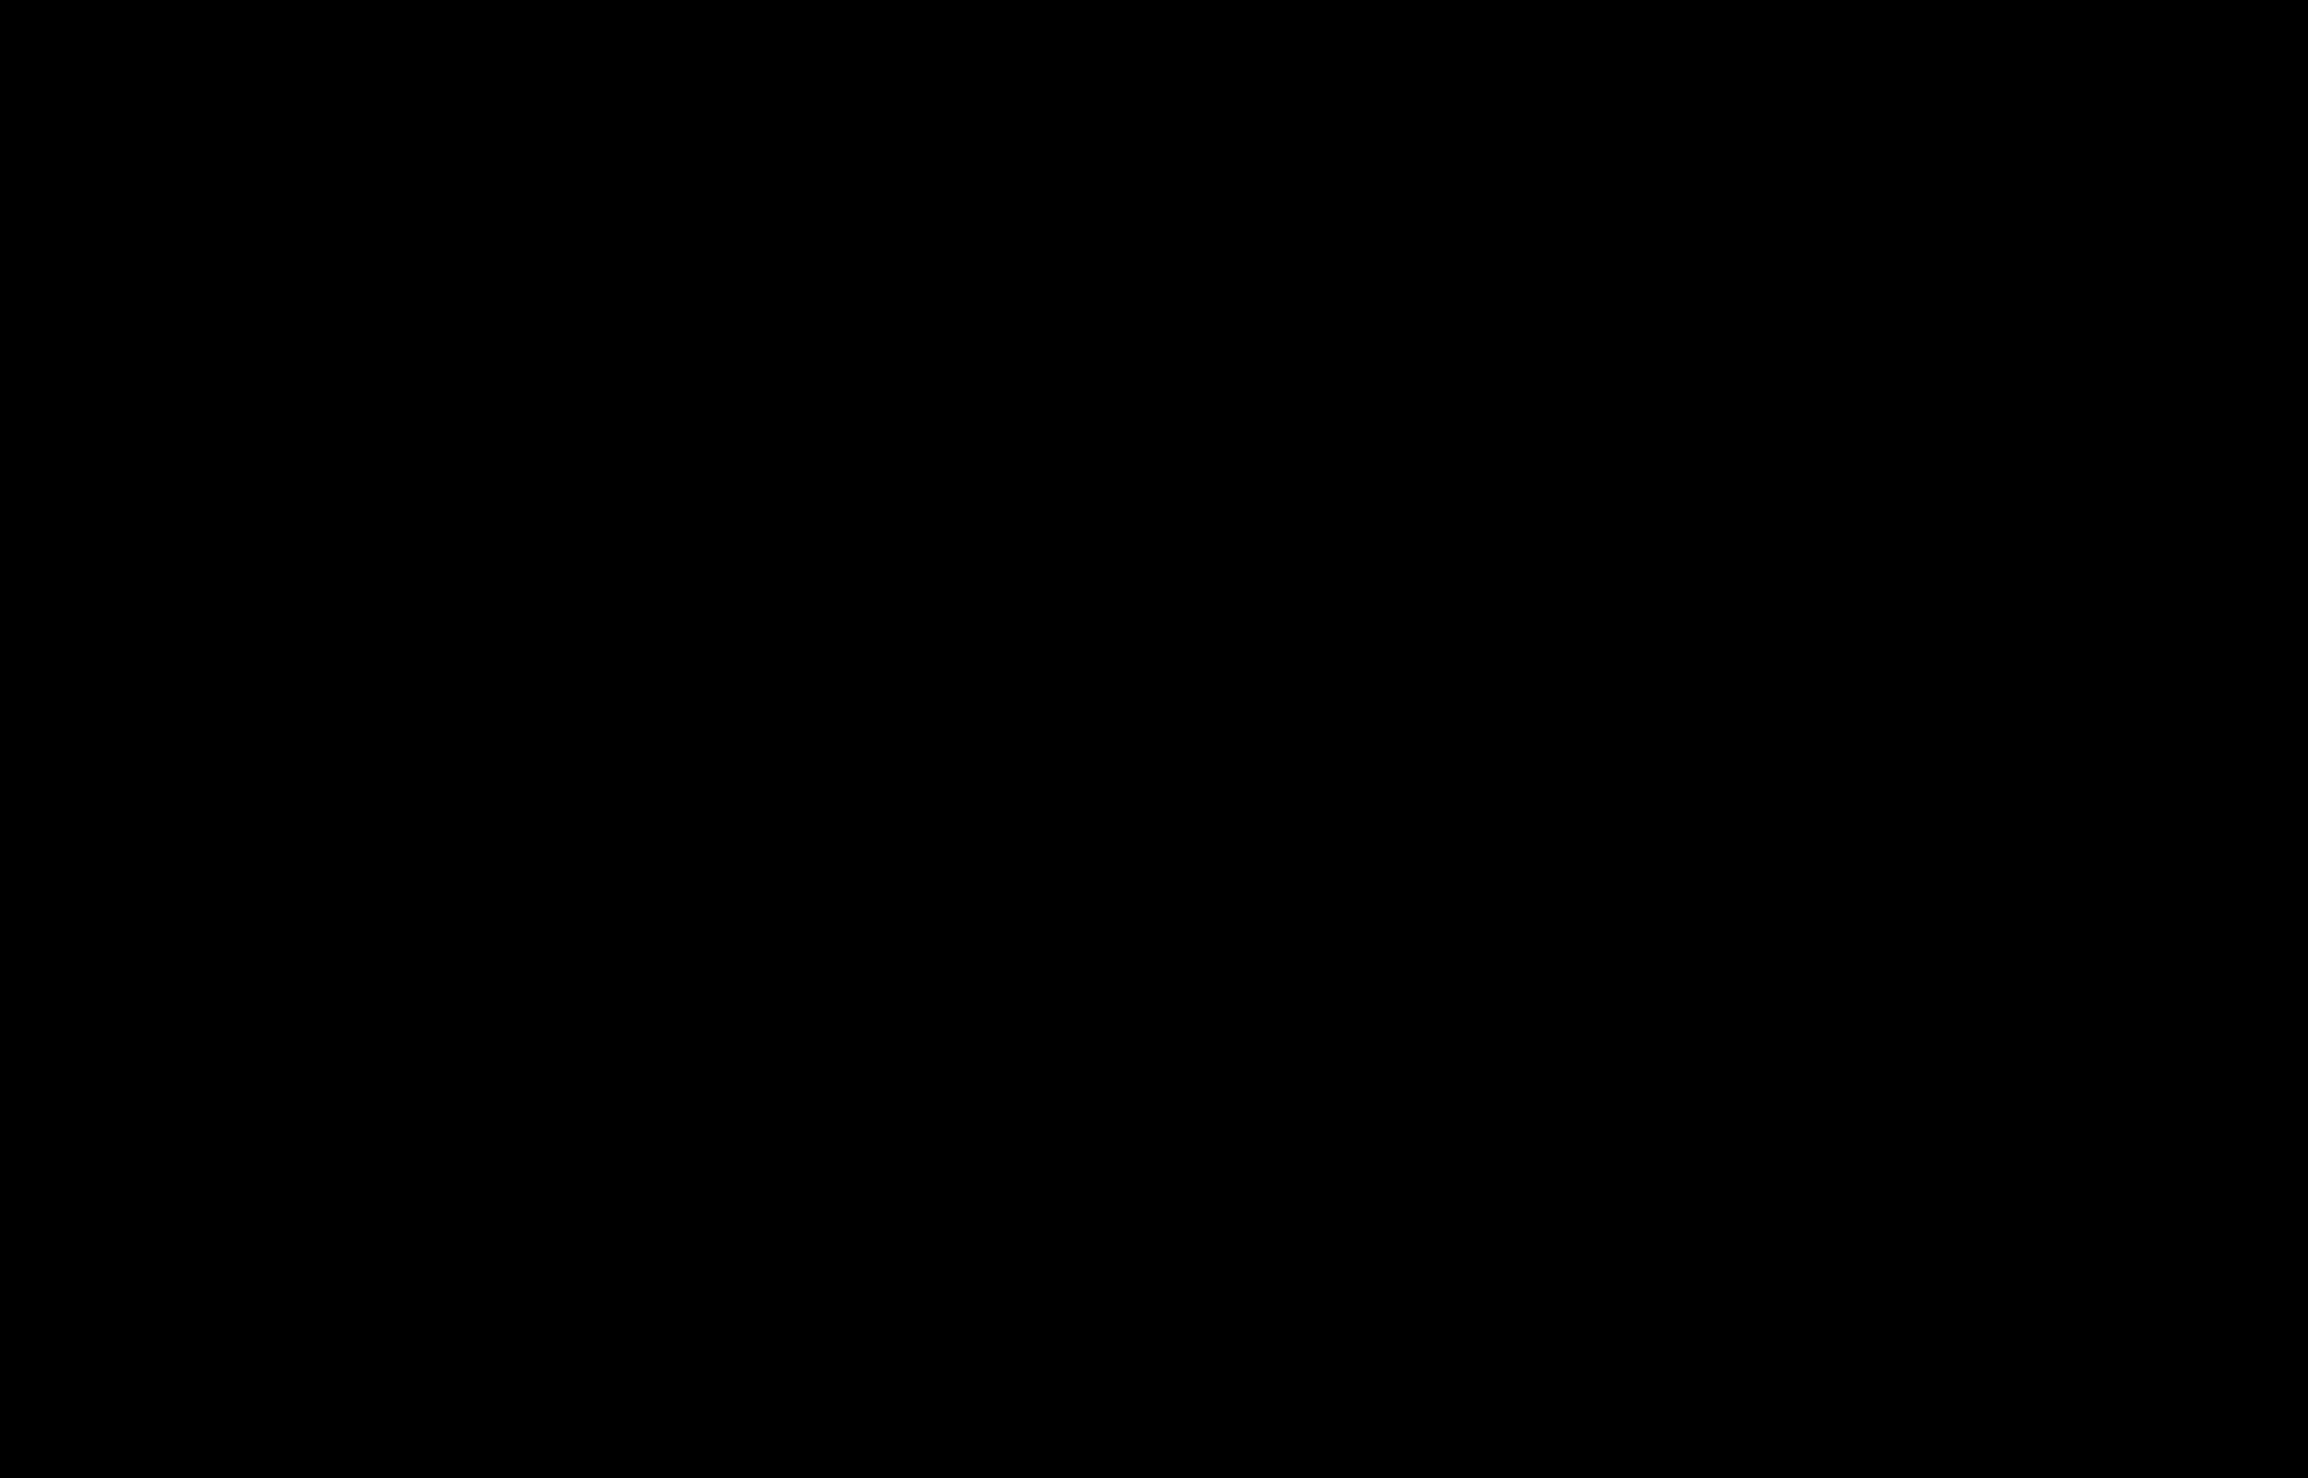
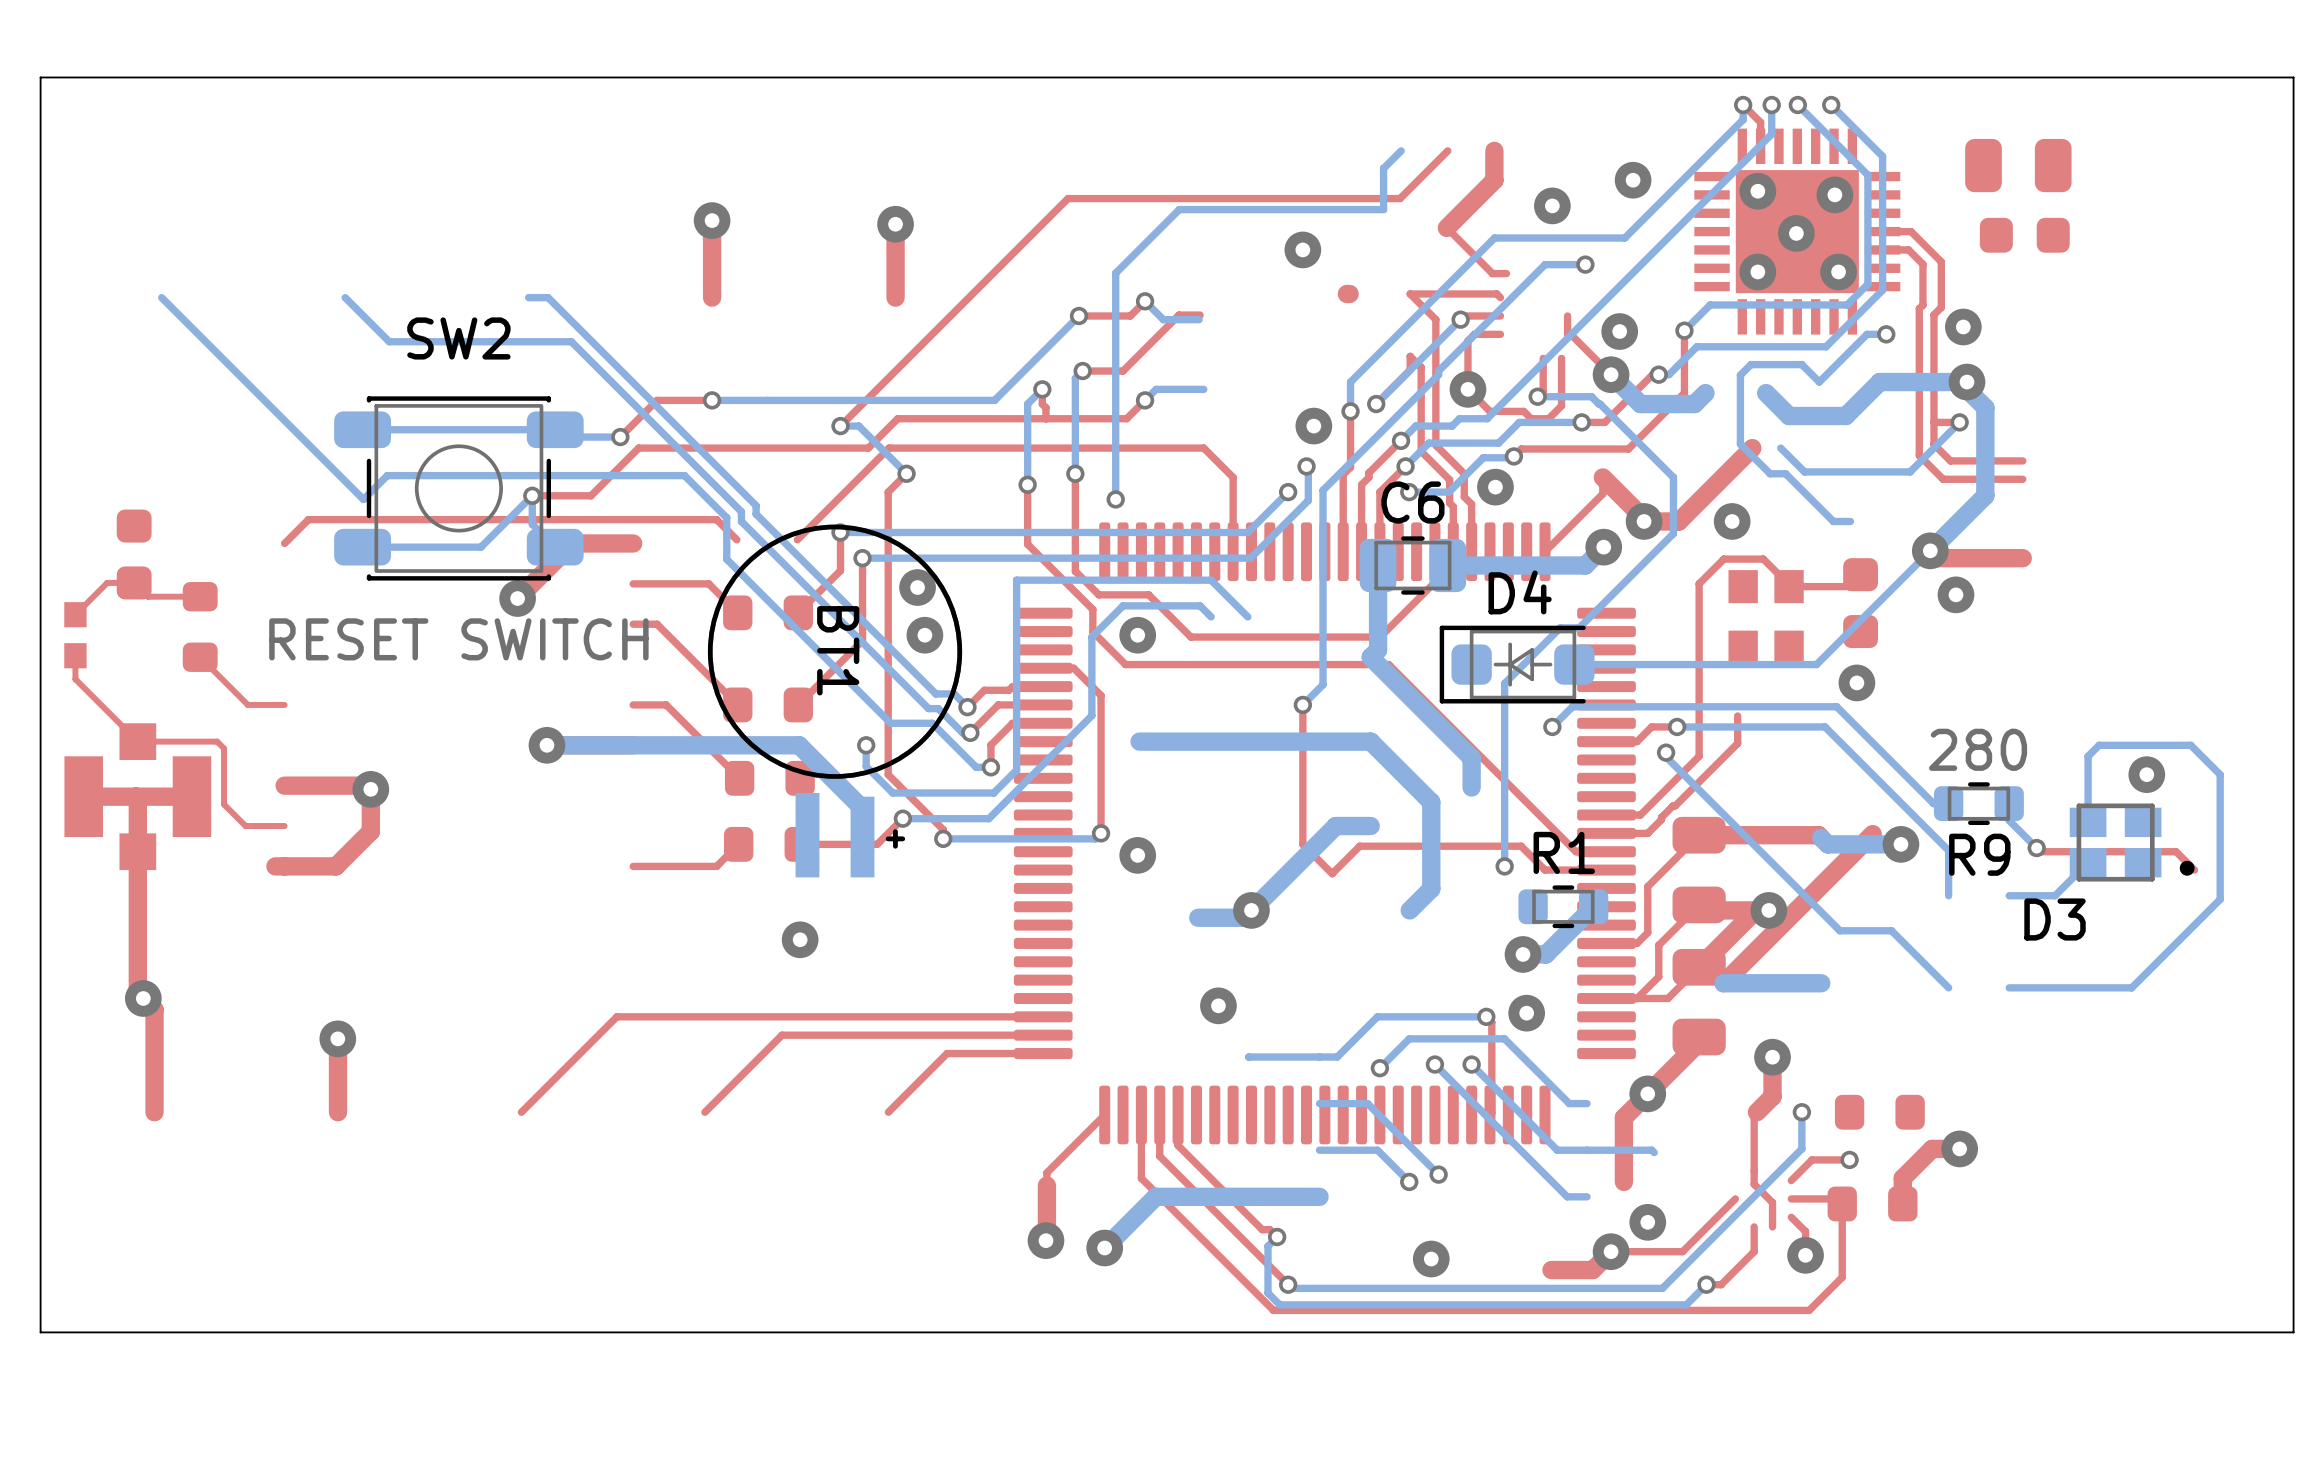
board edge: none -> (2293, 77) (2293, 1332) (40, 1332) (40, 77) (2293, 77)
top track: none -> (1743, 105) (1760, 122) (1760, 146)
bottom track: none -> (1743, 105) (1743, 119) (1624, 238) (1494, 238) (1350, 382) (1350, 411)
via: none -> (1743, 105)
bottom track: none -> (1771, 105) (1771, 134) (1487, 418) (1459, 418) (1452, 426) (1415, 426) (1401, 440)
via: none -> (1771, 105)
bottom track: none -> (1797, 105) (1867, 175) (1867, 284) (1847, 304) (1710, 304) (1684, 330)
via: none -> (1797, 105)
bottom track: none -> (1831, 105) (1882, 156) (1882, 290) (1826, 346) (1696, 346) (1668, 374) (1658, 374)
via: none -> (1831, 105)
bottom track: none -> (1401, 150) (1383, 168) (1383, 209) (1179, 209) (1115, 273) (1115, 499)
top track: none -> (1447, 150) (1400, 198) (1068, 198) (840, 426)
top track: none -> (1494, 150) (1494, 180) (1446, 227) (1492, 273) (1506, 273)
part: none -> (2018, 165)
via: none -> (1633, 180)
via: none -> (1757, 191)
via: none -> (1834, 194)
via: none -> (1552, 205)
top track: none -> (712, 220) (712, 297)
via: none -> (712, 220)
top track: none -> (895, 224) (895, 297)
via: none -> (895, 224)
part: none -> (1797, 231)
top track: none -> (1882, 231) (1911, 231) (1941, 261) (1941, 307) (1933, 314) (1933, 444) (1950, 460) (2022, 460)
via: none -> (1796, 233)
part: none -> (2024, 235)
via: none -> (1302, 249)
top track: none -> (1882, 249) (1908, 249) (1922, 264) (1922, 305) (1919, 308) (1919, 455) (1943, 479) (2022, 479)
bottom track: none -> (1585, 264) (1545, 264) (1323, 490) (1323, 684) (1302, 704)
via: none -> (1585, 264)
via: none -> (1757, 271)
via: none -> (1838, 271)
top track: none -> (1349, 293) (1346, 293)
bottom track: none -> (161, 297) (363, 499) (387, 475) (684, 475) (726, 517) (726, 559) (890, 723) (932, 723) (976, 767) (990, 767)
bottom track: none -> (345, 297) (389, 341) (571, 341) (741, 511) (741, 521) (928, 708) (938, 708) (962, 732) (970, 732)
bottom track: none -> (528, 297) (548, 297) (756, 505) (756, 514) (935, 693) (954, 693) (967, 707)
top track: none -> (1500, 297) (1496, 293) (1410, 293) (1435, 319) (1435, 445) (1464, 473) (1464, 496) (1471, 504) (1471, 551)
top track: none -> (1145, 301) (1130, 315) (1079, 315)
bottom track: none -> (1145, 301) (1163, 319) (1199, 319)
via: none -> (1145, 301)
bottom track: none -> (1079, 315) (994, 400) (712, 400)
via: none -> (1079, 315)
top track: none -> (1200, 315) (1179, 315) (1123, 371) (1082, 371)
top track: none -> (1500, 315) (1464, 315) (1460, 319)
top track: none -> (1567, 315) (1567, 334) (1570, 334) (1611, 374)
bottom track: none -> (1460, 319) (1376, 404)
via: none -> (1460, 319)
via: none -> (1963, 327)
top track: none -> (1684, 330) (1684, 393) (1628, 449) (1521, 449) (1513, 456)
via: none -> (1684, 330)
via: none -> (1619, 331)
top track: none -> (1500, 334) (1474, 334) (1467, 340) (1467, 389) (1489, 411) (1523, 411) (1531, 418) (1548, 418) (1561, 405) (1561, 358)
bottom track: none -> (1886, 334) (1867, 334) (1819, 382) (1801, 364) (1750, 364) (1740, 375) (1740, 444) (1770, 473) (1785, 473) (1833, 521) (1850, 521)
via: none -> (1886, 334)
top track: none -> (1543, 358) (1543, 391) (1537, 396)
bottom track: none -> (1082, 371) (1075, 378) (1075, 473)
via: none -> (1082, 371)
bottom track: none -> (1611, 374) (1640, 404) (1694, 404) (1705, 393)
via: none -> (1611, 374)
top track: none -> (1658, 374) (1652, 374) (1604, 422) (1581, 422)
via: none -> (1658, 374)
via: none -> (1967, 382)
top track: none -> (1042, 389) (1042, 404) (1045, 407) (1045, 418)
bottom track: none -> (1042, 389) (1027, 404) (1027, 484)
via: none -> (1042, 389)
bottom track: none -> (1203, 389) (1156, 389) (1145, 400)
via: none -> (1467, 389)
bottom track: none -> (1766, 393) (1789, 415) (1845, 415) (1879, 382) (1967, 382) (1967, 389) (1985, 407) (1985, 495) (1816, 664) (1574, 664)
bottom track: none -> (1537, 396) (1591, 396) (1673, 477) (1673, 533) (1579, 627) (1560, 627) (1504, 683) (1504, 866)
via: none -> (1537, 396)
top track: none -> (712, 400) (657, 400) (620, 437)
via: none -> (712, 400)
top track: none -> (1145, 400) (1126, 418) (897, 418) (868, 448) (638, 448) (590, 495) (532, 495)
via: none -> (1145, 400)
top track: none -> (1376, 404) (1410, 370) (1410, 356) (1421, 367) (1421, 451) (1449, 479) (1449, 503) (1453, 506) (1453, 551)
via: none -> (1376, 404)
top track: none -> (1350, 411) (1350, 467) (1343, 474) (1343, 551)
via: none -> (1350, 411)
bottom track: none -> (1581, 422) (1519, 422) (1498, 443) (1428, 443) (1405, 466)
via: none -> (1581, 422)
top track: none -> (1959, 422) (1933, 422)
bottom track: none -> (1959, 422) (1910, 471) (1804, 471) (1780, 448)
via: none -> (1959, 422)
bottom track: none -> (840, 426) (858, 426) (906, 473)
via: none -> (840, 426)
via: none -> (1313, 426)
bottom track: none -> (362, 429) (555, 429) (562, 437) (620, 437)
via: none -> (620, 437)
top track: none -> (1401, 440) (1368, 472) (1368, 477) (1361, 484) (1361, 551)
via: none -> (1401, 440)
top track: none -> (1752, 448) (1678, 521) (1644, 521) (1644, 518) (1602, 477) (1602, 493) (1545, 551)
bottom track: none -> (1513, 456) (1483, 457) (1448, 492) (1409, 492)
via: none -> (1513, 456)
bottom track: none -> (1306, 466) (1308, 468) (1308, 500) (1250, 558) (862, 558)
via: none -> (1306, 466)
top track: none -> (1405, 466) (1379, 492) (1379, 551)
via: none -> (1405, 466)
top track: none -> (906, 473) (888, 492) (888, 774) (943, 829) (943, 838)
via: none -> (906, 473)
top track: none -> (1075, 473) (1075, 571) (1098, 594) (1148, 594) (1190, 637) (1380, 637) (1434, 582) (1434, 551)
via: none -> (1075, 473)
top track: none -> (1027, 484) (1027, 544) (1092, 609) (1092, 631) (1125, 664) (1388, 664) (1575, 851) (1606, 851)
via: none -> (1027, 484)
via: none -> (1495, 487)
SW2: none -> RESET SWITCH (458, 488)
bottom track: none -> (1288, 492) (1247, 532) (840, 532)
via: none -> (1288, 492)
via: none -> (1409, 492)
via: none -> (532, 495)
via: none -> (1115, 499)
via: none -> (1644, 521)
via: none -> (1732, 521)
top track: none -> (840, 532) (840, 570) (798, 612)
via: none -> (840, 532)
top track: none -> (736, 539) (716, 519) (308, 519) (284, 543)
top track: none -> (797, 539) (889, 448) (1203, 448) (1233, 477) (1233, 551)
top track: none -> (633, 543) (572, 543) (517, 598)
bottom track: none -> (555, 547) (532, 524) (532, 495) (480, 547) (362, 547)
bottom track: none -> (1603, 547) (1585, 565) (1447, 565)
via: none -> (1603, 547)
top track: none -> (1930, 550) (1937, 558) (2022, 558)
via: none -> (1930, 550)
part: none -> (134, 554)
top track: none -> (862, 558) (862, 640) (798, 704)
via: none -> (862, 558)
bottom track: none -> (1378, 565) (1378, 649) (1370, 657) (1471, 758) (1471, 787)
C6: none -> (1412, 565)
top track: none -> (1860, 574) (1848, 586) (1789, 586) (1763, 559) (1723, 559) (1699, 583) (1699, 756) (1640, 815) (1606, 815)
top track: none -> (633, 583) (708, 583) (737, 612)
via: none -> (917, 587)
via: none -> (1955, 594)
top track: none -> (200, 596) (147, 596) (134, 582) (107, 582) (75, 614)
via: none -> (517, 598)
part: none -> (1860, 603)
part: none -> (768, 612)
bottom track: none -> (1211, 616) (1200, 605) (1123, 605) (1091, 637) (1091, 715) (988, 818) (902, 818)
bottom track: none -> (1247, 616) (1211, 580) (1016, 580) (1016, 770) (993, 793) (892, 793) (866, 766) (866, 745)
part: none -> (1766, 616)
top track: none -> (633, 624) (657, 624) (737, 704)
part: none -> (200, 626)
part: none -> (75, 635)
via: none -> (924, 635)
via: none -> (1137, 635)
top track: none -> (75, 655) (75, 679) (137, 741) (217, 741) (224, 748) (224, 804) (245, 826) (284, 826)
top track: none -> (200, 657) (247, 704) (284, 704)
D4: none -> (1517, 664)
top track: none -> (1043, 668) (1073, 668) (1101, 695) (1101, 833)
via: none -> (1856, 682)
top track: none -> (1043, 686) (1012, 686) (1009, 690) (984, 690) (967, 707)
BT1: none -> (835, 701)
top track: none -> (633, 704) (666, 704) (739, 778)
part: none -> (768, 704)
top track: none -> (1043, 704) (998, 704) (970, 732)
top track: none -> (1302, 704) (1302, 844) (1332, 873) (1359, 846) (1521, 846) (1545, 870) (1606, 870)
via: none -> (1302, 704)
via: none -> (967, 707)
top track: none -> (1737, 715) (1737, 743) (1661, 817) (1647, 833) (1606, 833)
top track: none -> (1043, 723) (1012, 723) (990, 745) (990, 767)
bottom track: none -> (1552, 726) (1572, 706) (1836, 706) (1933, 803) (1948, 803)
via: none -> (1552, 726)
top track: none -> (1677, 726) (1651, 726) (1637, 741) (1606, 741)
bottom track: none -> (1677, 726) (1825, 726) (1948, 850) (1948, 895)
via: none -> (1677, 726)
via: none -> (970, 732)
bottom track: none -> (1139, 741) (1370, 741) (1431, 802) (1431, 888) (1409, 910)
bottom track: none -> (546, 745) (799, 745) (862, 808) (862, 837)
via: none -> (546, 745)
via: none -> (866, 745)
bottom track: none -> (1666, 752) (1666, 756) (1839, 930) (1891, 930) (1948, 987)
via: none -> (1666, 752)
via: none -> (990, 767)
via: none -> (2146, 774)
part: none -> (769, 778)
top track: none -> (284, 785) (367, 785) (370, 789) (370, 831) (335, 866) (275, 866)
via: none -> (370, 789)
top track: none -> (136, 796) (137, 798) (137, 992) (154, 1009) (154, 1112)
part: none -> (137, 796)
top track: none -> (191, 796) (83, 796)
R9: none -> 280 (1978, 803)
bottom track: none -> (2009, 803) (2009, 820) (2036, 848)
top track: none -> (902, 818) (877, 844) (799, 844)
via: none -> (902, 818)
bottom track: none -> (2088, 822) (2088, 756) (2099, 745) (2190, 745) (2220, 774) (2220, 899) (2131, 987) (2009, 987)
bottom track: none -> (1370, 826) (1335, 826) (1244, 917) (1198, 917)
bottom track: none -> (1101, 833) (1095, 838) (943, 838)
via: none -> (1101, 833)
part: none -> (1324, 833)
top track: none -> (1872, 834) (1723, 983)
top track: none -> (1821, 837) (1818, 835) (1699, 835) (1647, 886) (1647, 932) (1637, 943) (1606, 943)
bottom track: none -> (1821, 837) (1827, 844) (1900, 844)
via: none -> (943, 838)
D3: none -> (2132, 842)
top track: none -> (738, 844) (716, 866) (633, 866)
part: none -> (768, 844)
via: none -> (1900, 844)
top track: none -> (2036, 848) (2040, 851) (2176, 851) (2194, 870)
via: none -> (2036, 848)
via: none -> (1137, 855)
bottom track: none -> (2088, 862) (2055, 895) (2009, 895)
via: none -> (1504, 866)
part: none -> (1699, 870)
R1: none -> (1563, 906)
bottom track: none -> (1593, 906) (1545, 954) (1523, 954)
via: none -> (1251, 910)
top track: none -> (1756, 910) (1667, 998) (1606, 998)
top track: none -> (1768, 910) (1704, 910) (1699, 904) (1658, 945) (1658, 976) (1637, 998)
via: none -> (1768, 910)
via: none -> (800, 939)
via: none -> (1523, 954)
bottom track: none -> (1821, 983) (1723, 983)
via: none -> (143, 998)
part: none -> (1699, 1002)
via: none -> (1218, 1005)
via: none -> (1526, 1013)
top track: none -> (1043, 1016) (616, 1016) (521, 1112)
top track: none -> (1486, 1016) (1491, 1022) (1491, 1113) (1489, 1114)
bottom track: none -> (1486, 1016) (1377, 1016) (1337, 1057) (1248, 1057)
via: none -> (1486, 1016)
top track: none -> (1043, 1035) (781, 1035) (704, 1112)
top track: none -> (1699, 1037) (1699, 1042) (1623, 1117) (1623, 1181)
via: none -> (337, 1038)
top track: none -> (337, 1039) (337, 1112)
top track: none -> (1043, 1053) (947, 1053) (888, 1112)
top track: none -> (1772, 1057) (1772, 1096) (1754, 1114) (1754, 1184) (1772, 1202) (1772, 1226)
via: none -> (1772, 1057)
bottom track: none -> (1434, 1064) (1567, 1196) (1587, 1196)
via: none -> (1434, 1064)
bottom track: none -> (1471, 1064) (1557, 1150) (1651, 1150) (1654, 1152)
via: none -> (1471, 1064)
bottom track: none -> (1379, 1068) (1409, 1038) (1504, 1038) (1569, 1103) (1587, 1103)
via: none -> (1379, 1068)
via: none -> (1647, 1093)
bottom track: none -> (1319, 1103) (1367, 1103) (1438, 1174)
bottom track: none -> (1801, 1112) (1801, 1148) (1662, 1288) (1291, 1288) (1288, 1284)
via: none -> (1801, 1112)
part: none -> (1879, 1112)
top track: none -> (1104, 1114) (1046, 1172) (1045, 1240)
top track: none -> (1141, 1114) (1141, 1178) (1273, 1310) (1809, 1310) (1842, 1277) (1842, 1203) (1837, 1198) (1791, 1198)
top track: none -> (1159, 1114) (1159, 1156) (1288, 1284)
top track: none -> (1178, 1114) (1178, 1145) (1262, 1229) (1269, 1229) (1277, 1236)
top track: none -> (1959, 1148) (1932, 1148) (1902, 1178) (1902, 1203)
via: none -> (1959, 1148)
bottom track: none -> (1319, 1150) (1377, 1150) (1409, 1181)
top track: none -> (1849, 1159) (1811, 1159) (1791, 1180)
via: none -> (1849, 1159)
via: none -> (1438, 1174)
via: none -> (1409, 1181)
bottom track: none -> (1319, 1196) (1155, 1196) (1104, 1248)
top track: none -> (1735, 1198) (1682, 1251) (1611, 1251) (1592, 1270) (1551, 1270)
part: none -> (1872, 1203)
top track: none -> (1791, 1217) (1805, 1231) (1805, 1255)
via: none -> (1647, 1222)
top track: none -> (1754, 1226) (1754, 1251) (1721, 1284) (1706, 1284)
bottom track: none -> (1277, 1236) (1267, 1246) (1267, 1293) (1279, 1304) (1686, 1304) (1706, 1284)
via: none -> (1277, 1236)
via: none -> (1045, 1240)
via: none -> (1104, 1248)
via: none -> (1611, 1251)
via: none -> (1805, 1255)
via: none -> (1431, 1259)
via: none -> (1288, 1284)
via: none -> (1706, 1284)

